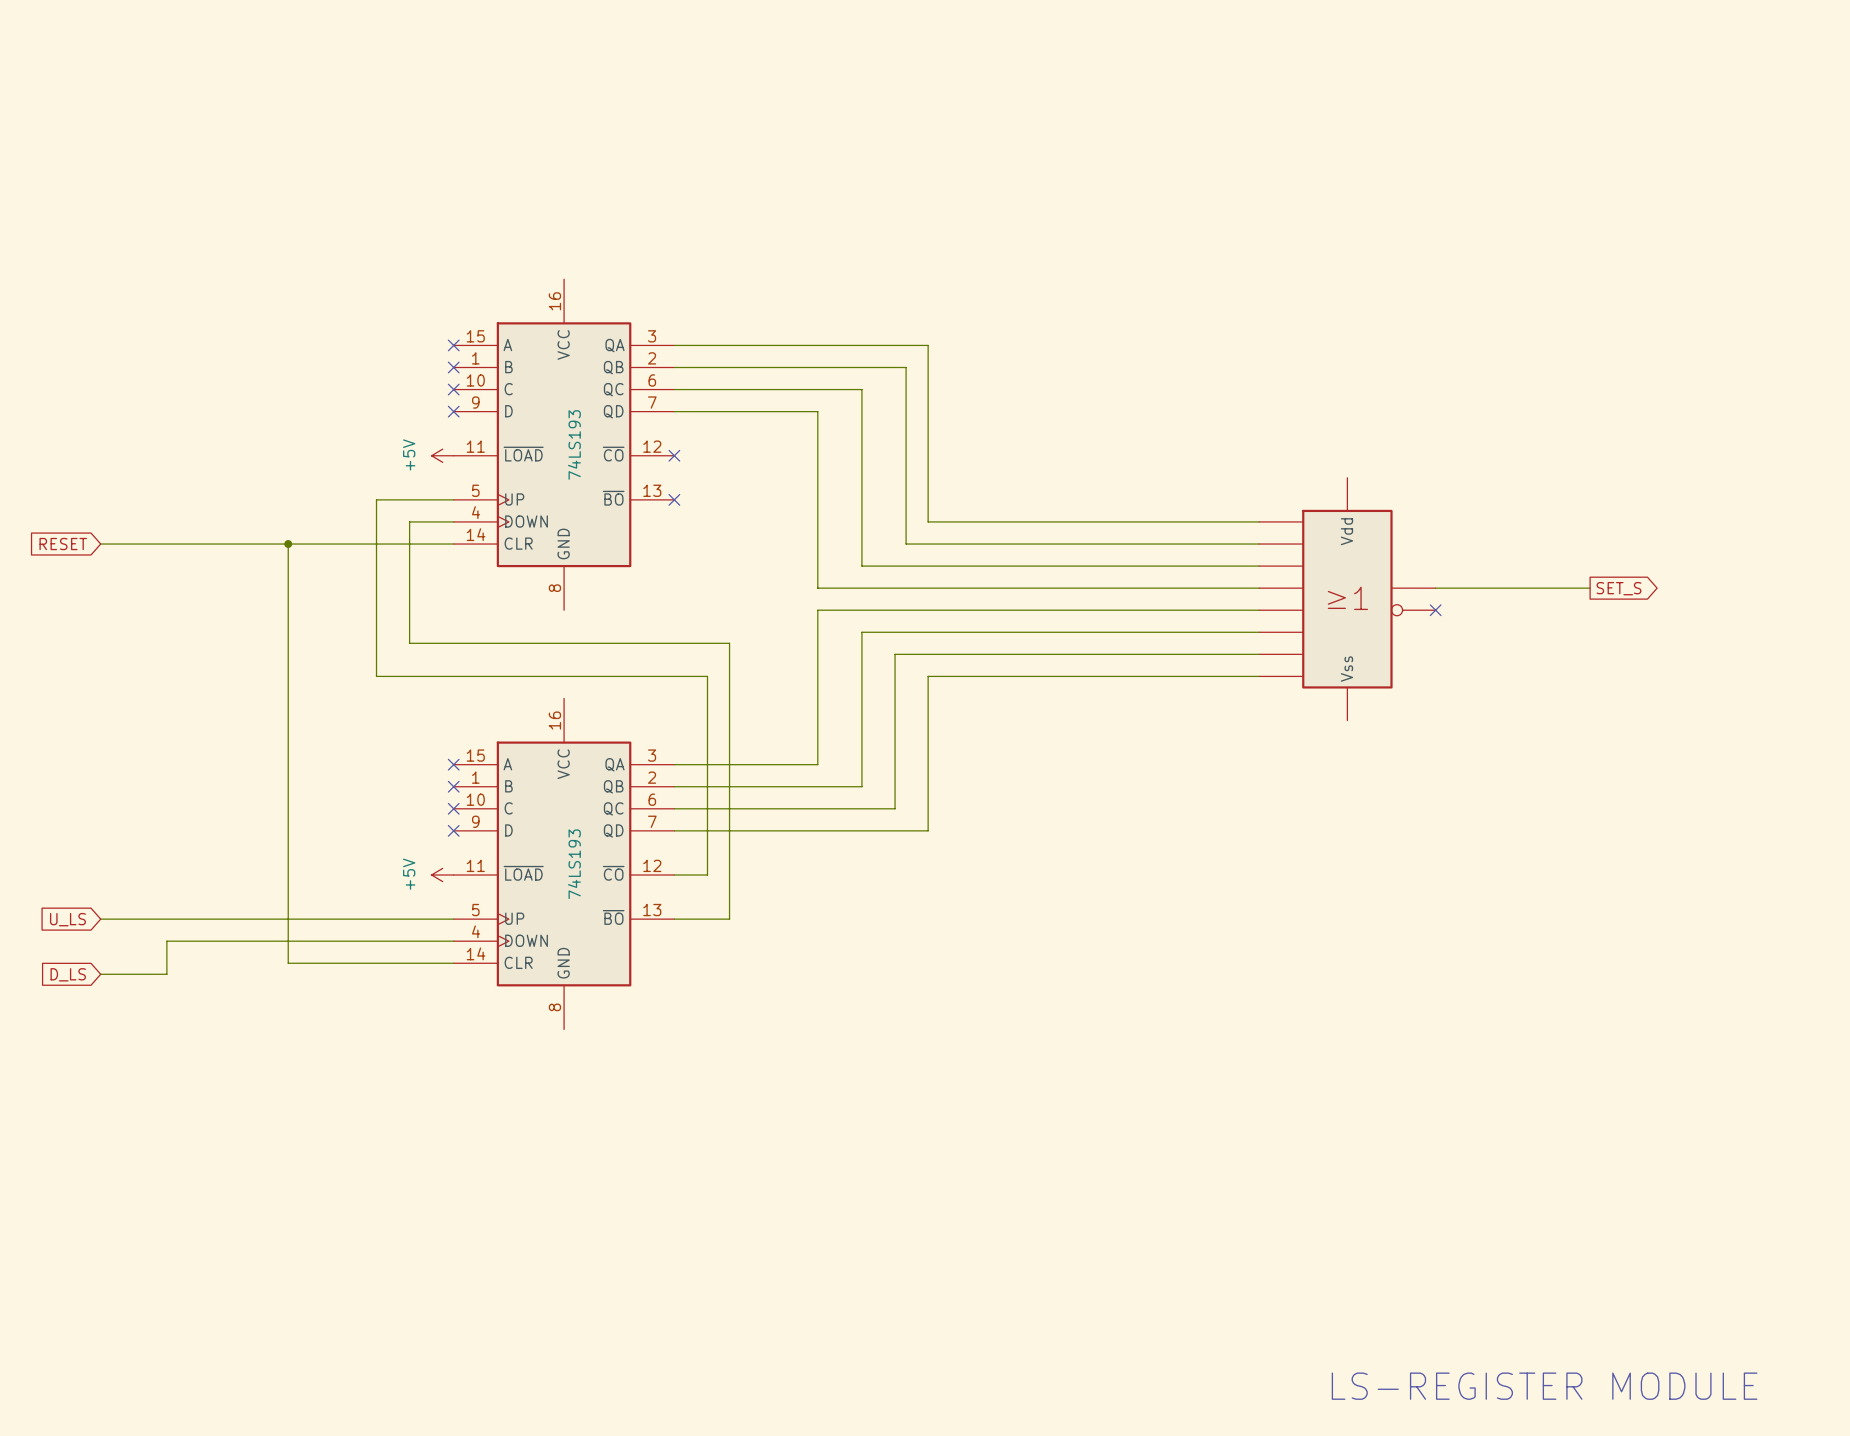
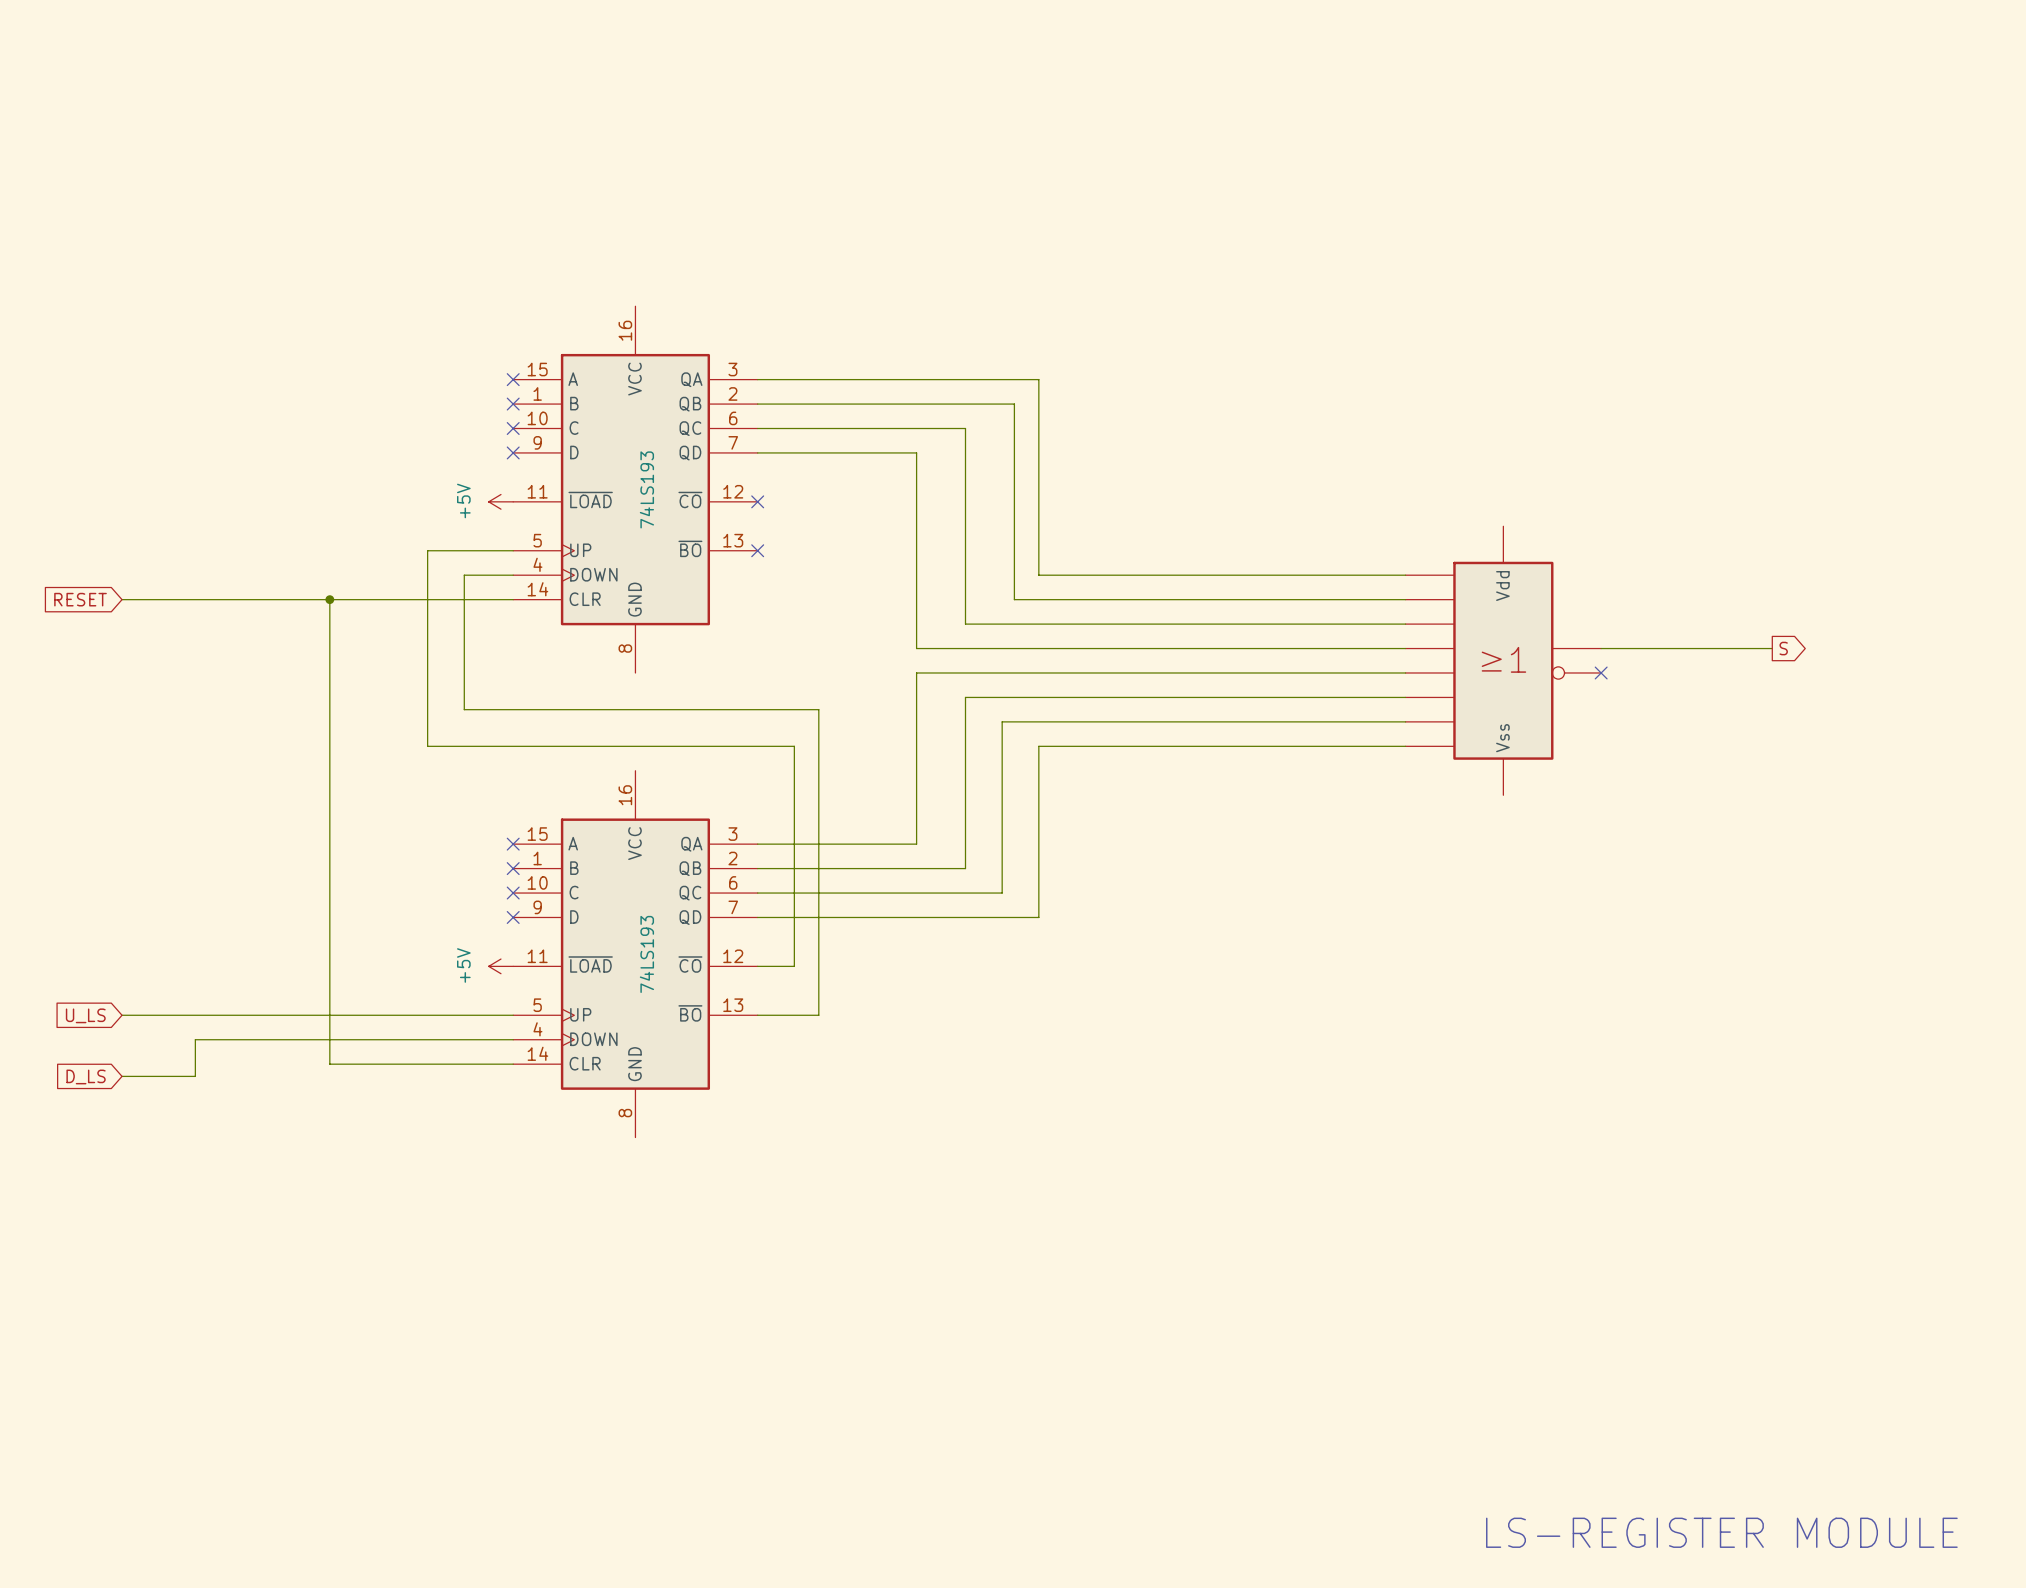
global label: SET_S (1619, 588) -> S (1783, 648)

